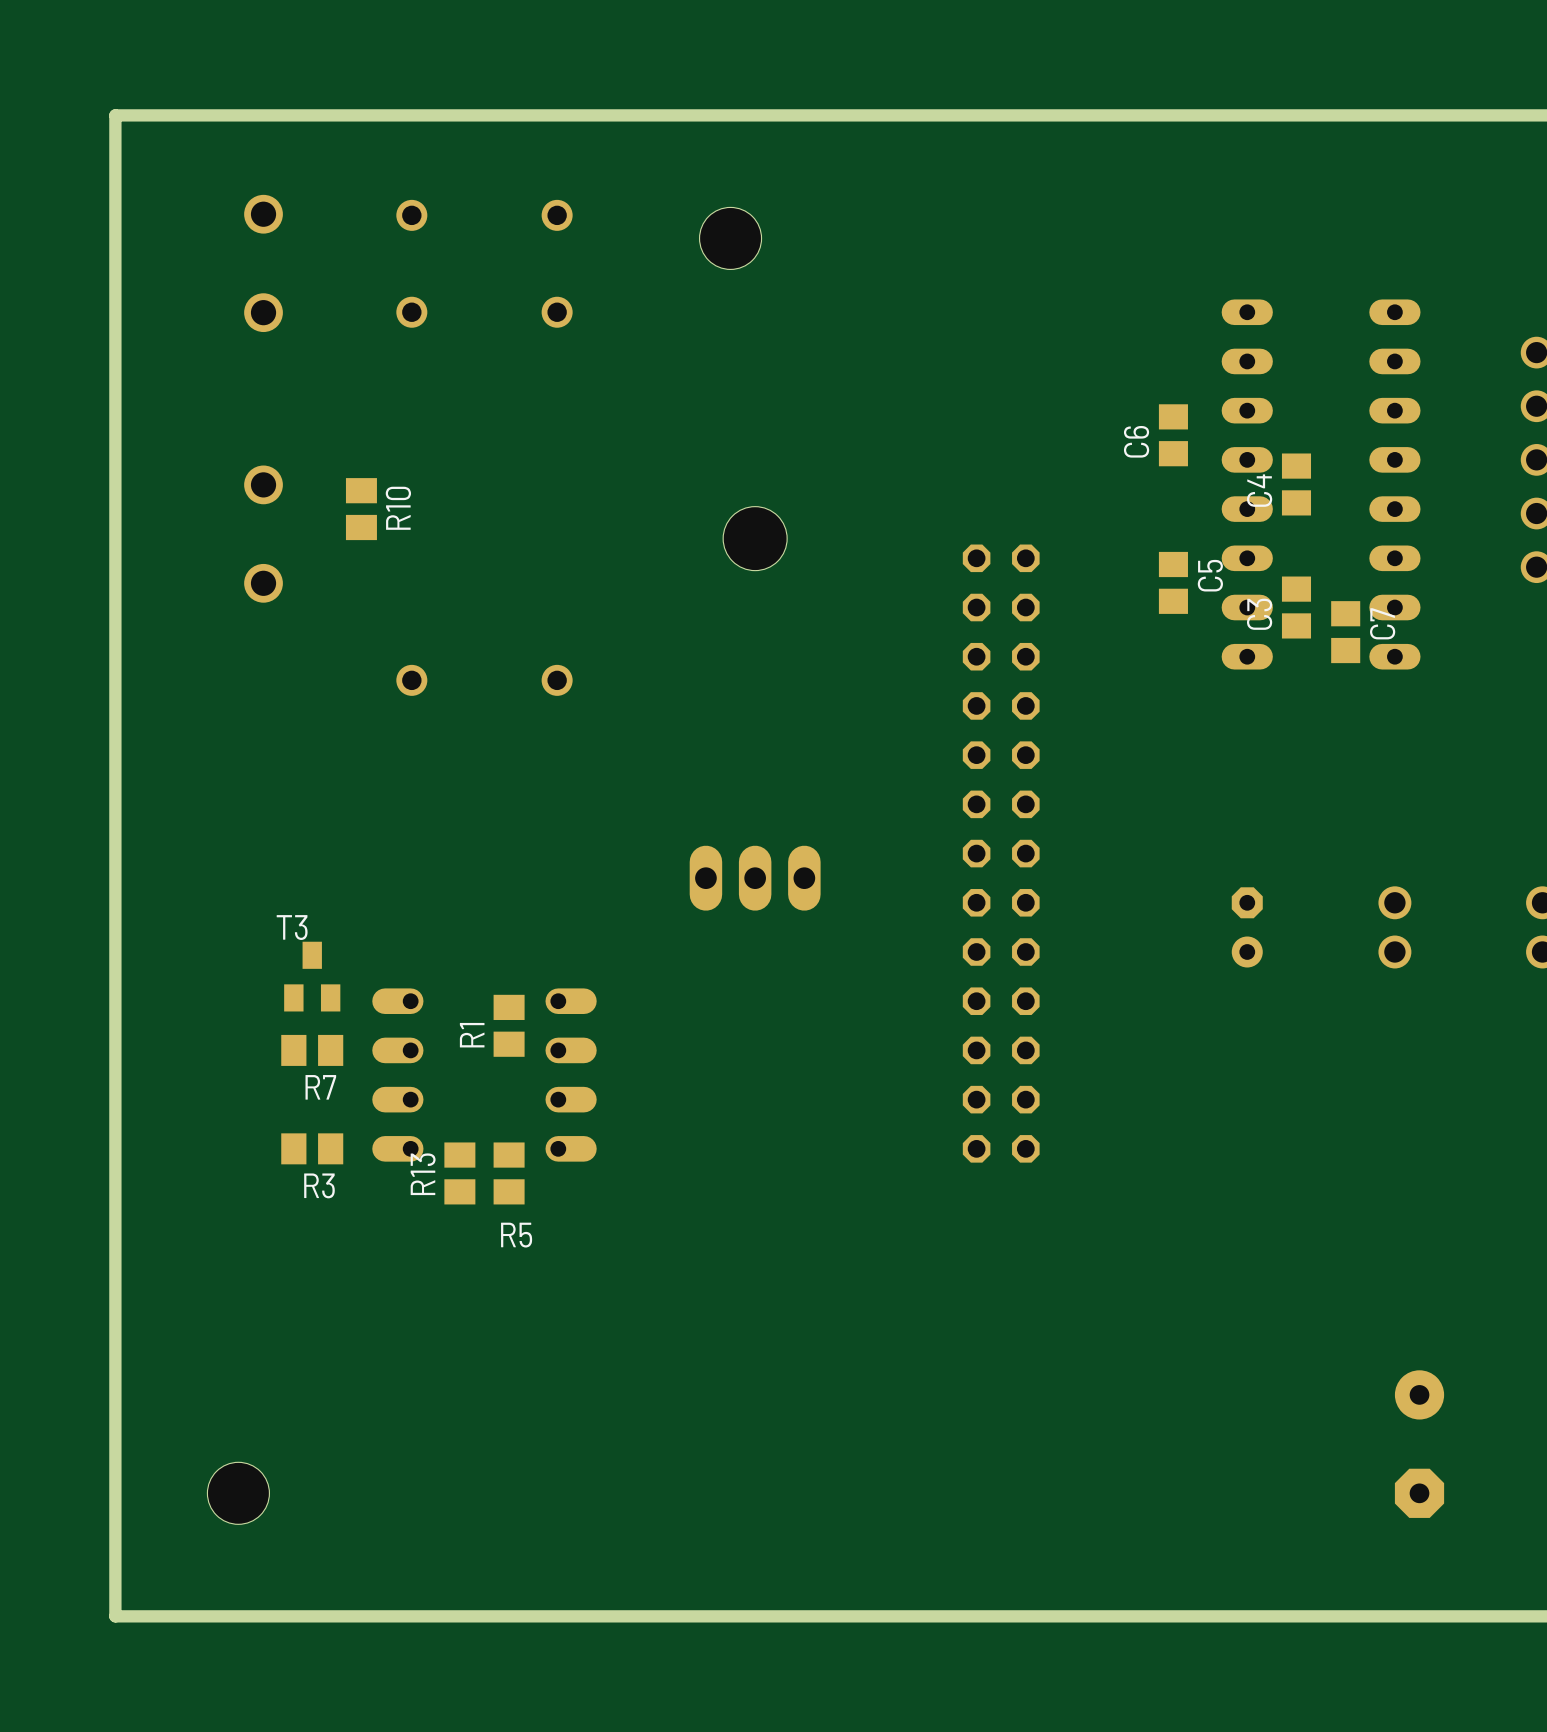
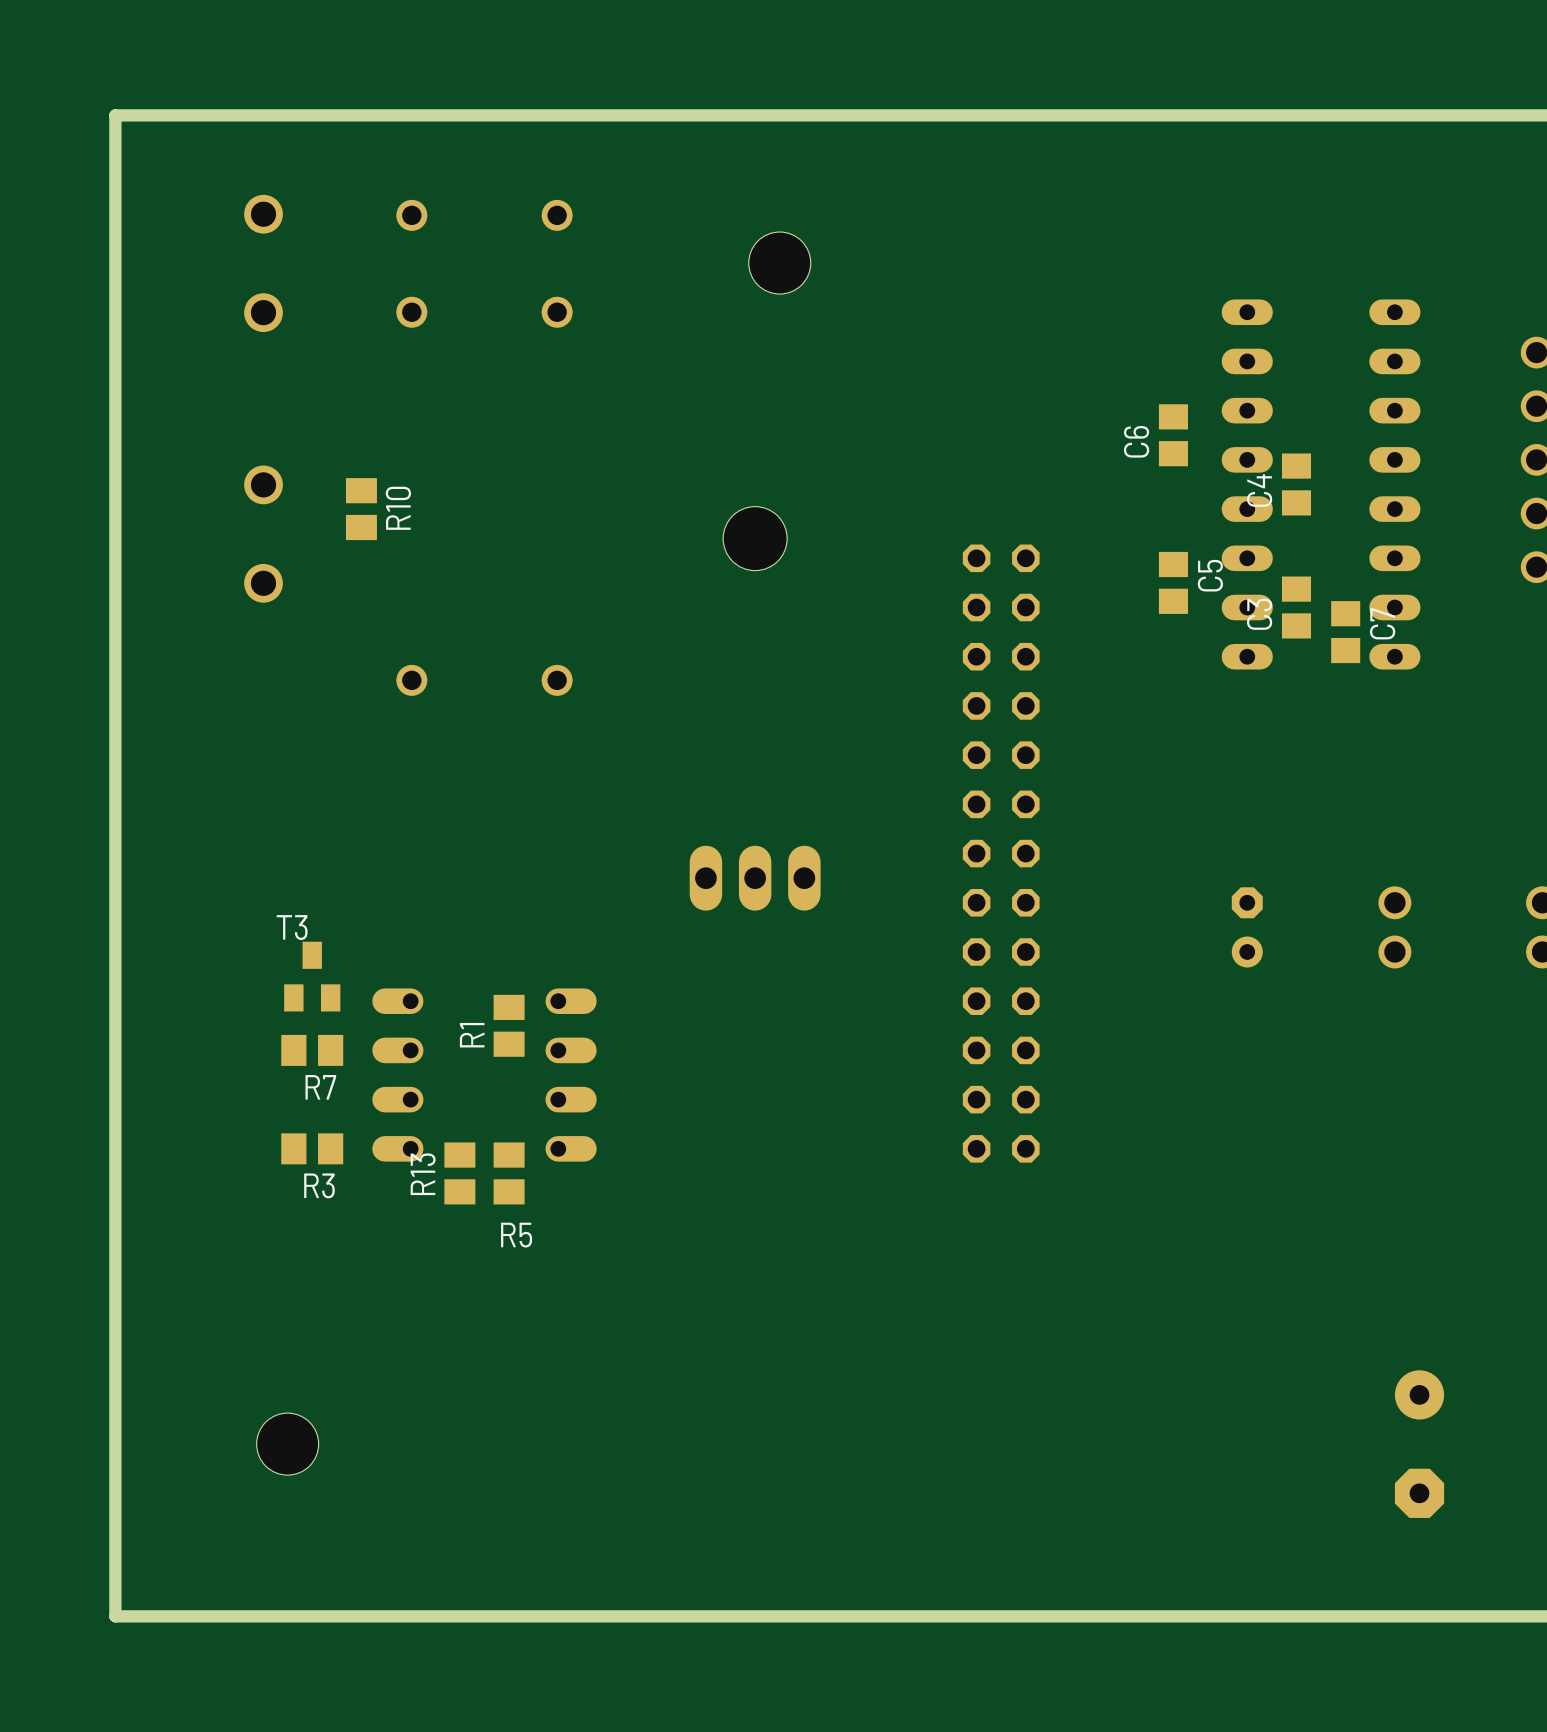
part position: (730, 238) -> (779, 263)
part position: (238, 1493) -> (287, 1444)

